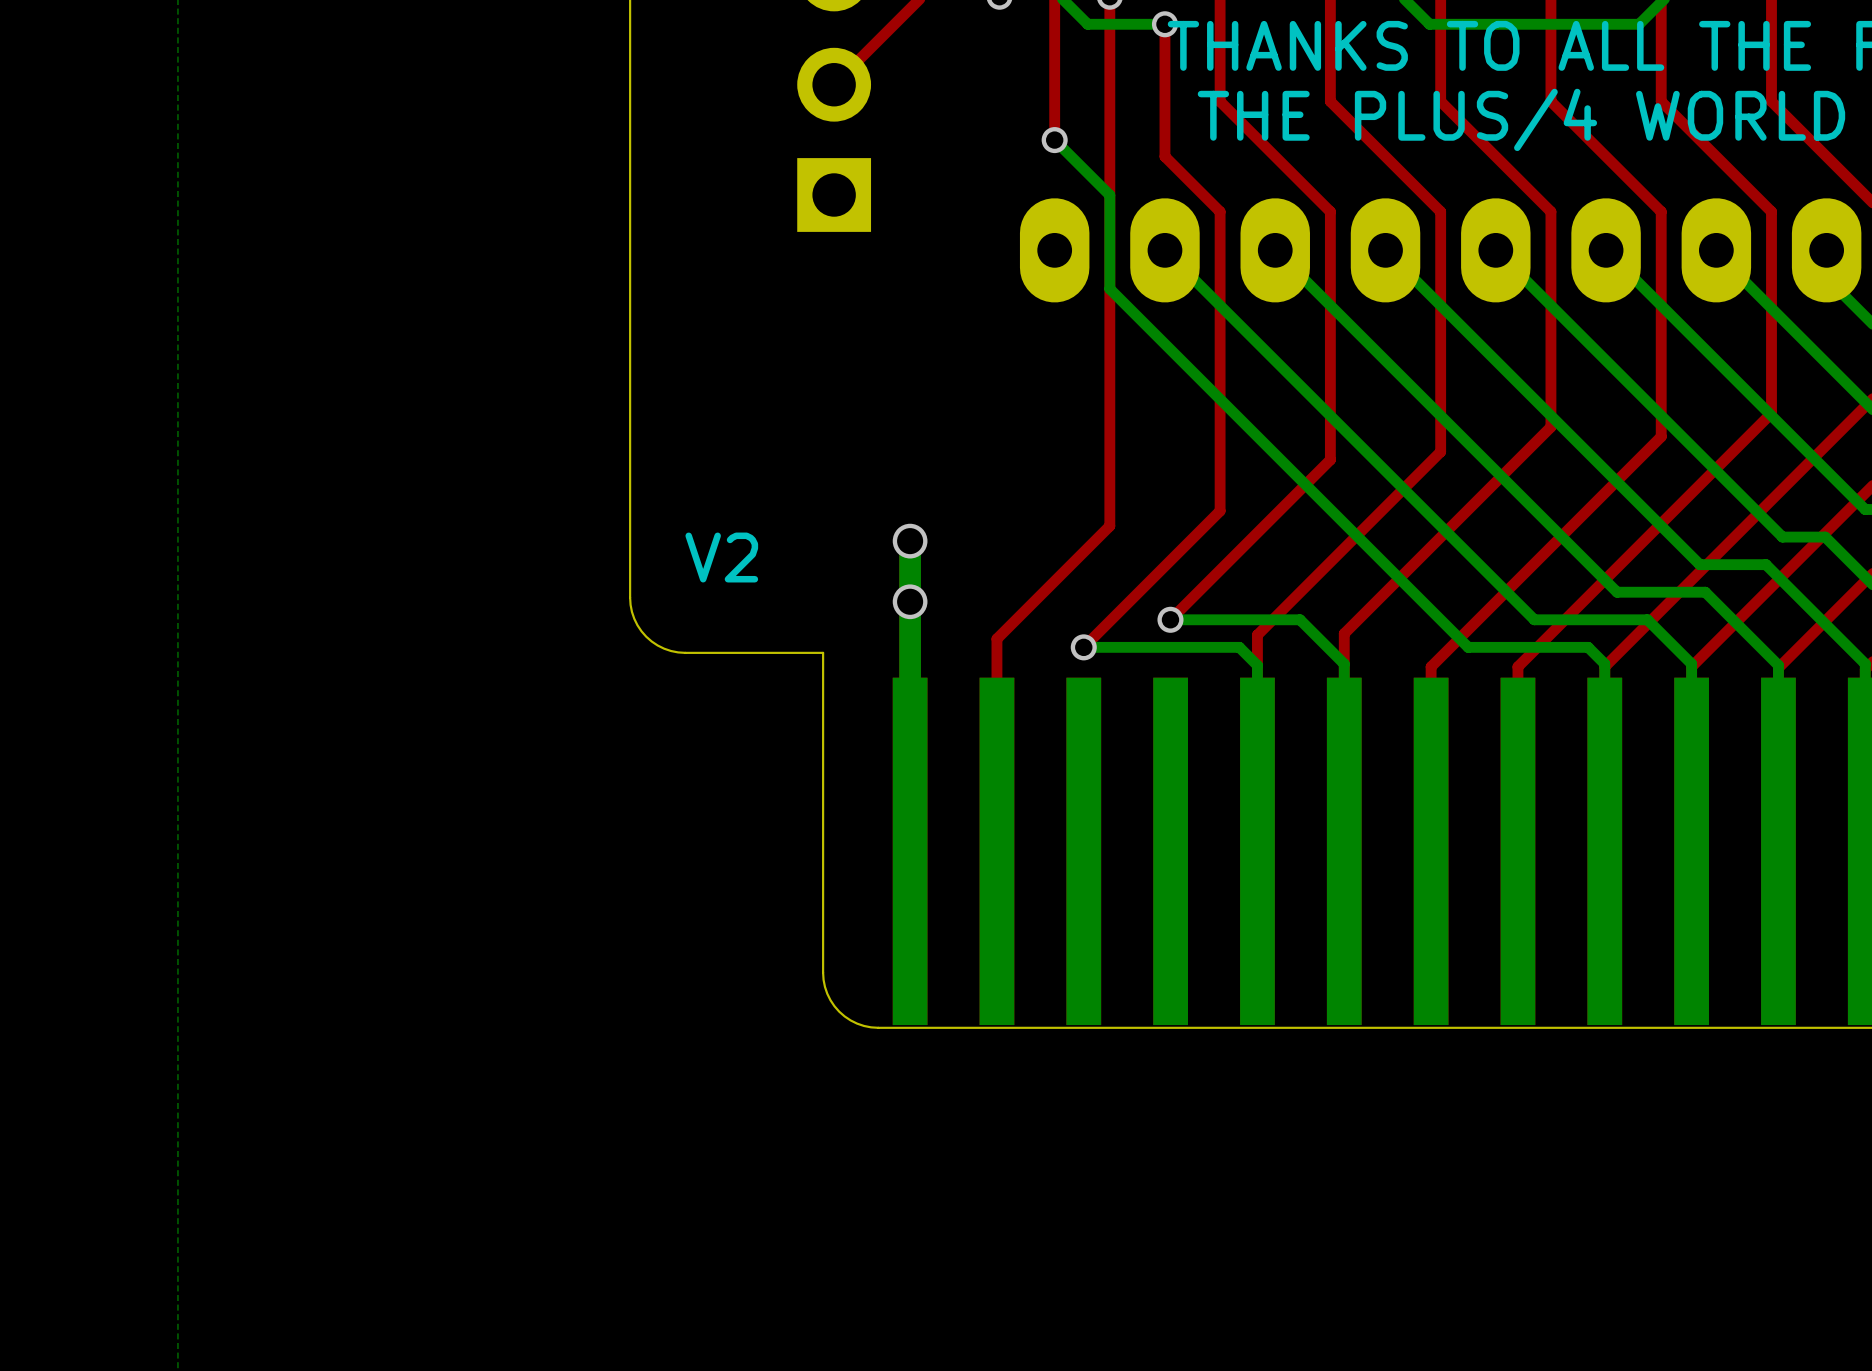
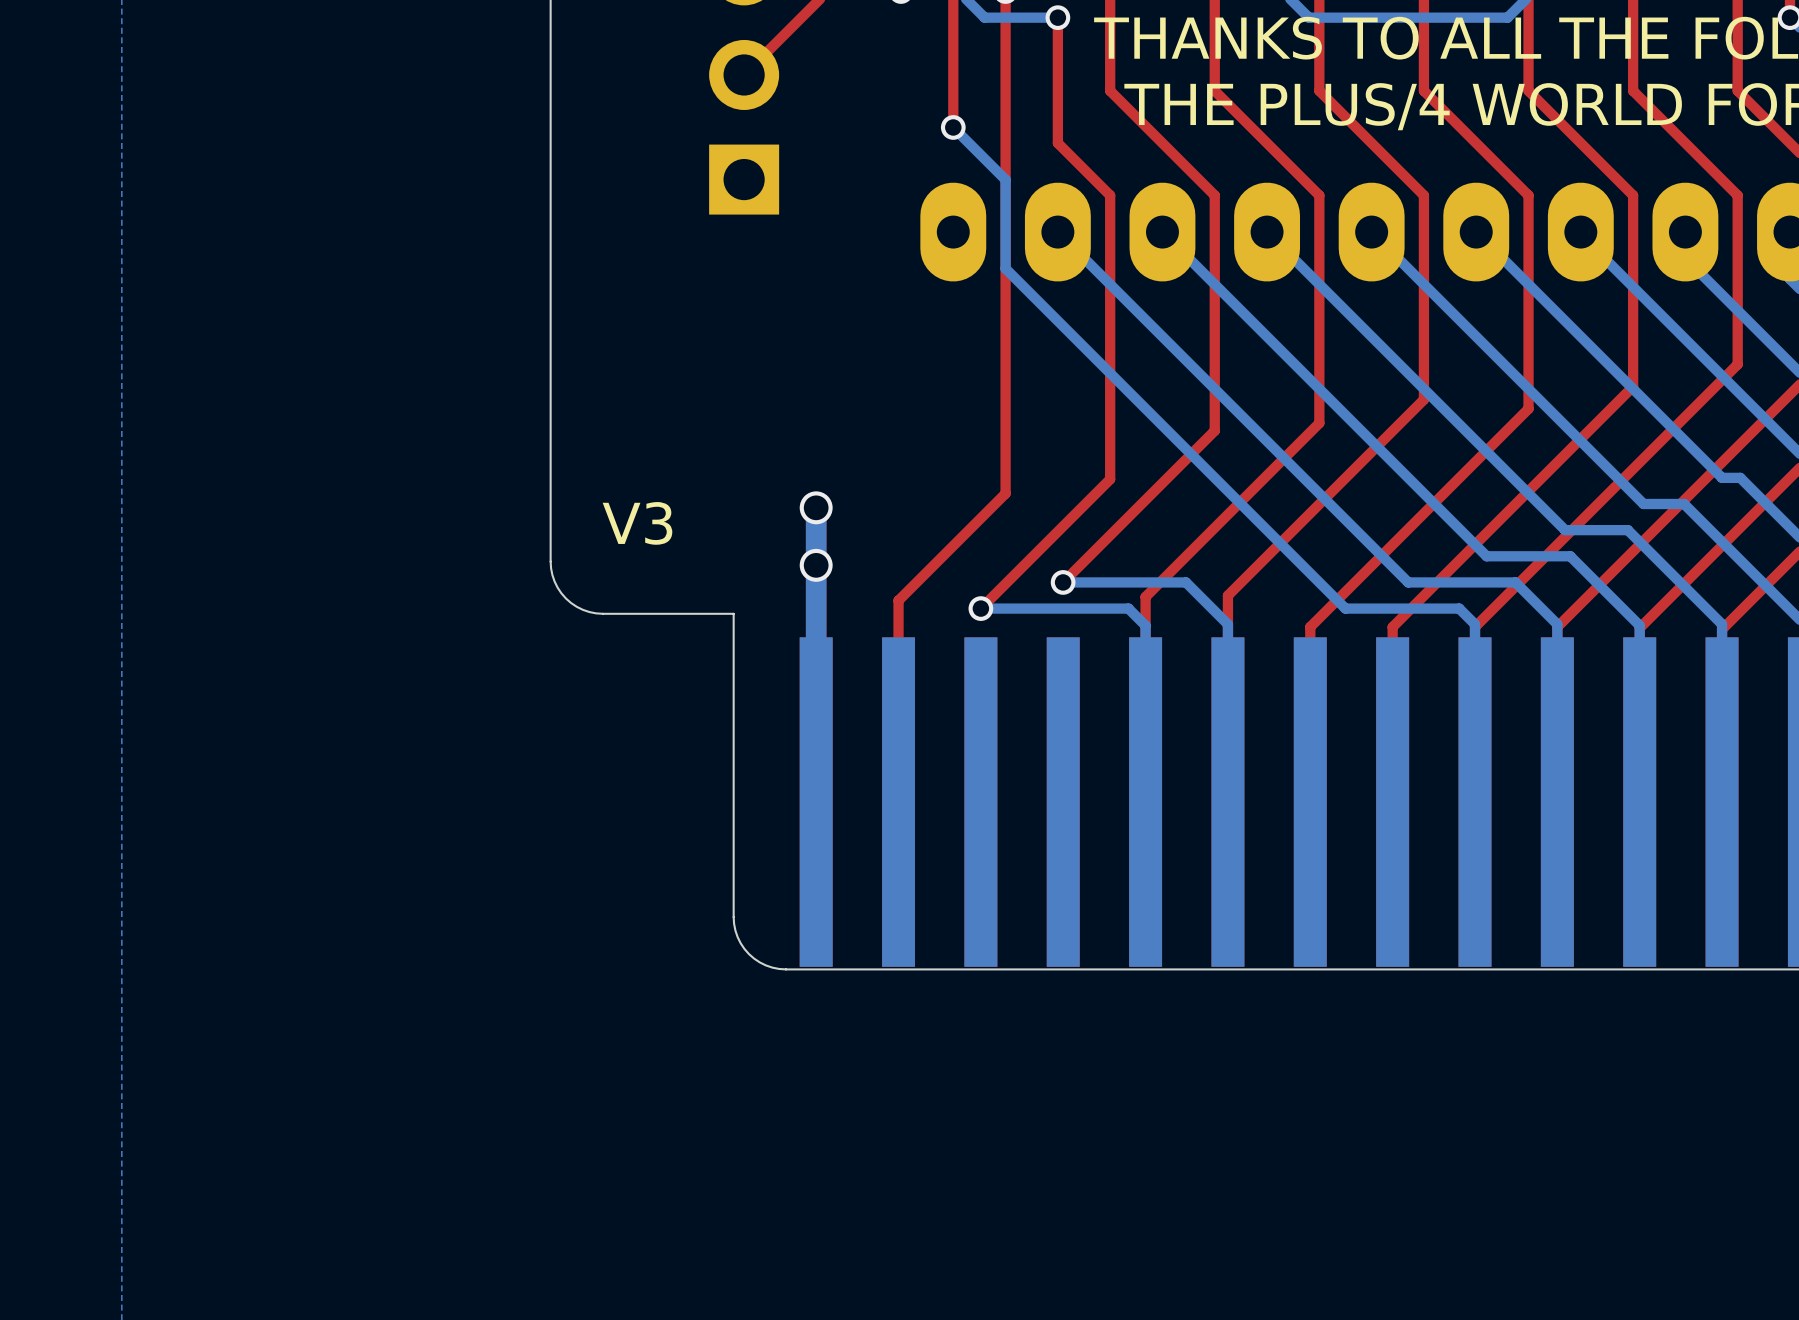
text: V2 (721, 557) -> V3 (637, 523)

